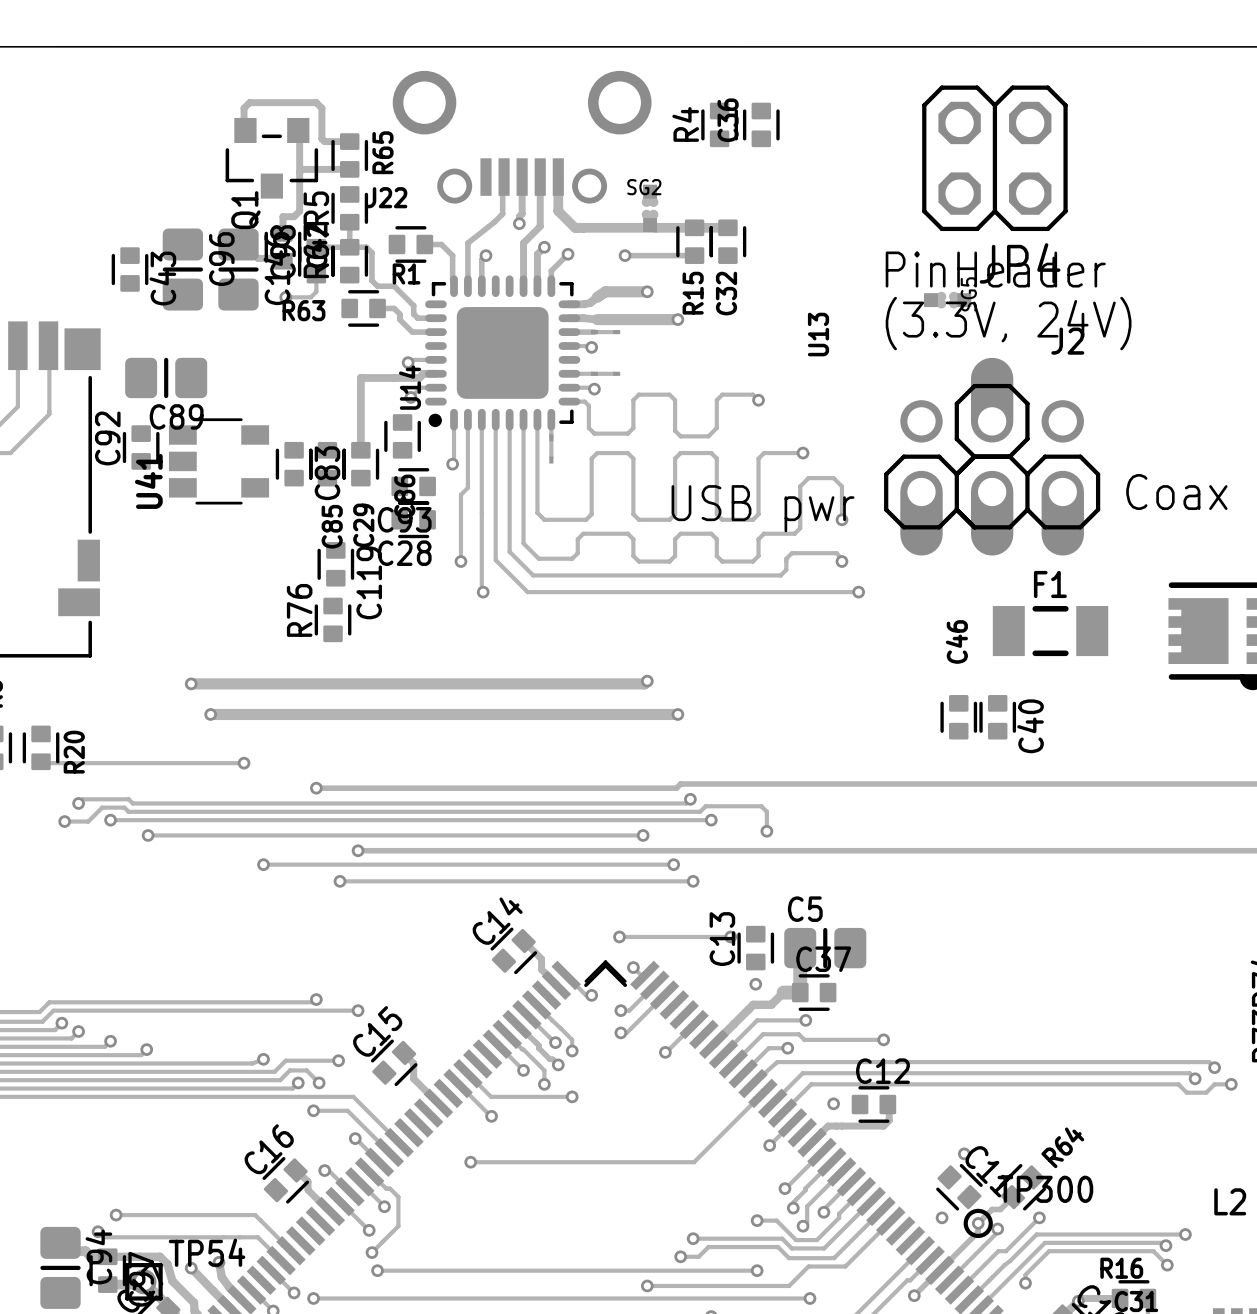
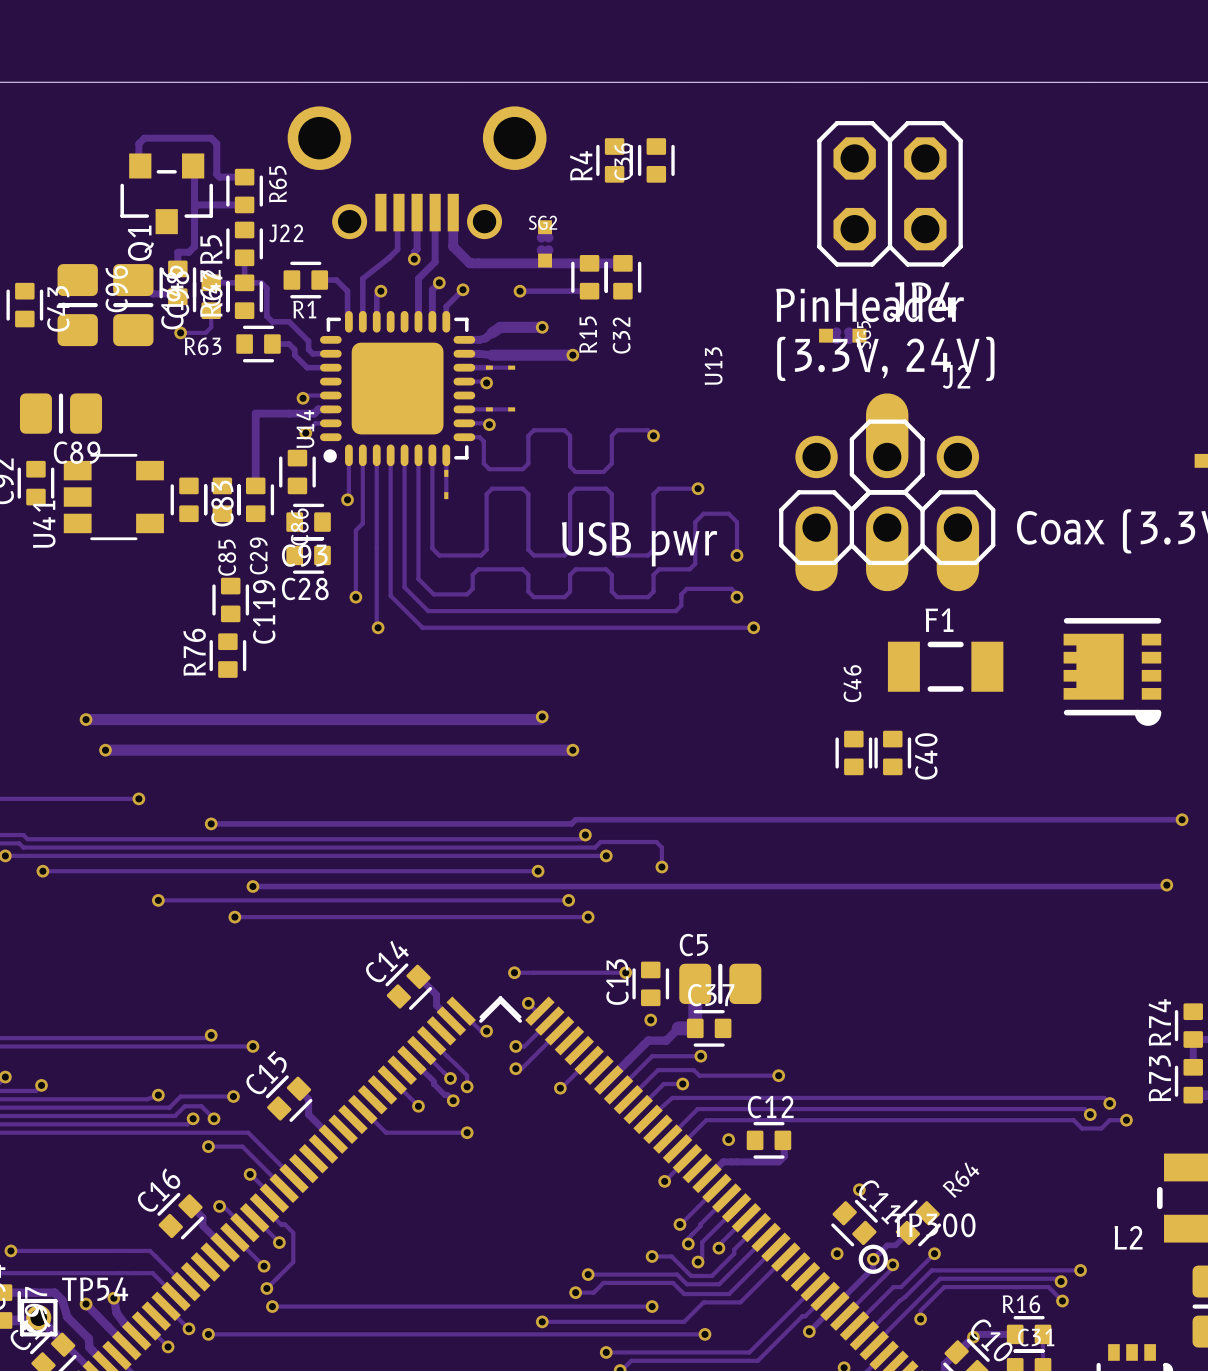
track: (507, 1034) (544, 1070) (544, 1084) -> none
track: (458, 1083) (491, 1116) -> none
via: (544, 1084) -> none
track: (762, 1093) (694, 1162) (470, 1162) -> none
via: (491, 1116) -> none
via: (470, 1162) -> none

